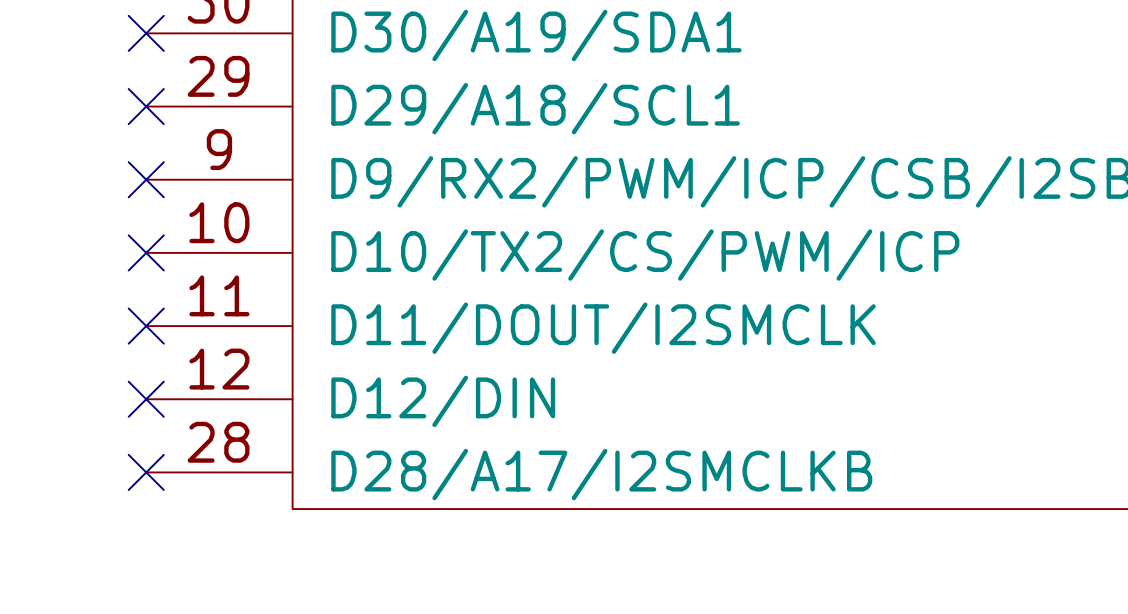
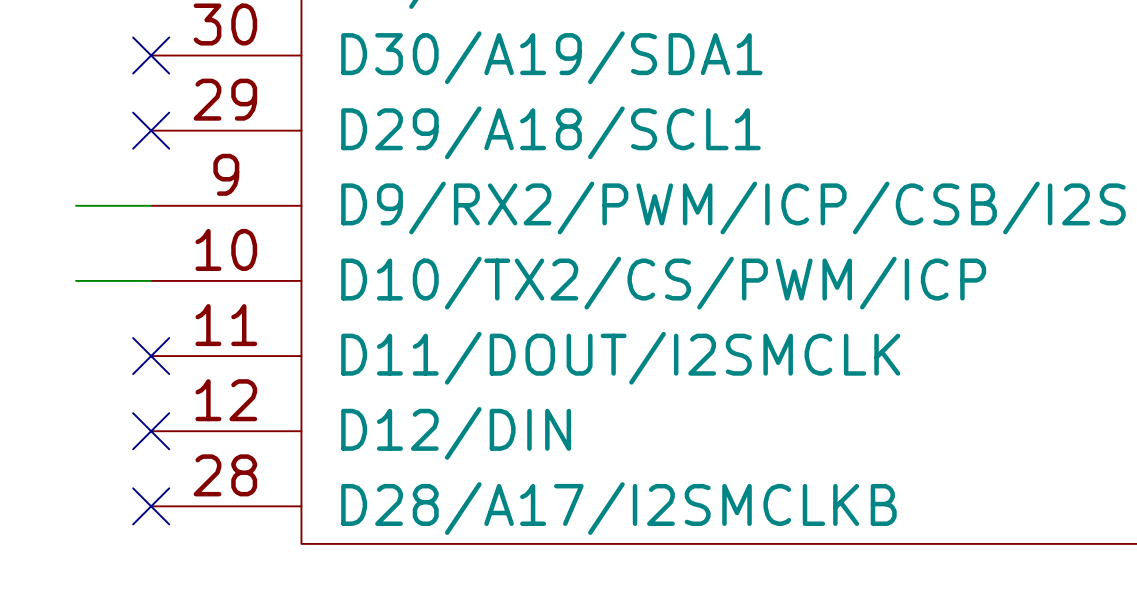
wire: none -> (76, 205) (151, 205)
no-connect mark: (146, 179) -> none
wire: none -> (76, 280) (151, 280)
no-connect mark: (146, 252) -> none

